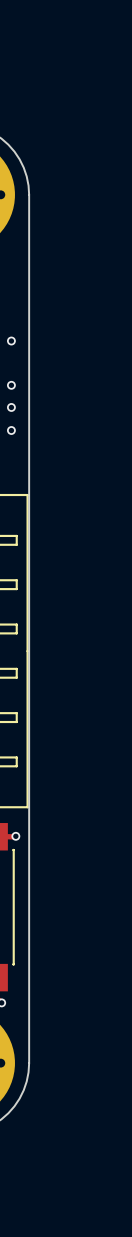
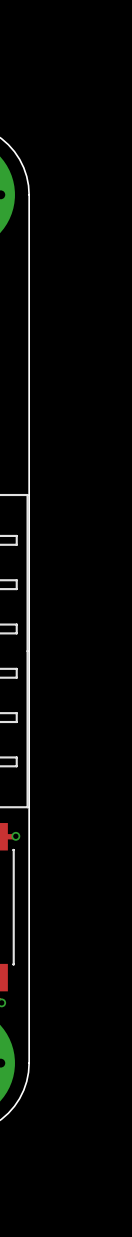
via: (11, 341) -> none
via: (11, 385) -> none
via: (11, 407) -> none
via: (11, 430) -> none

